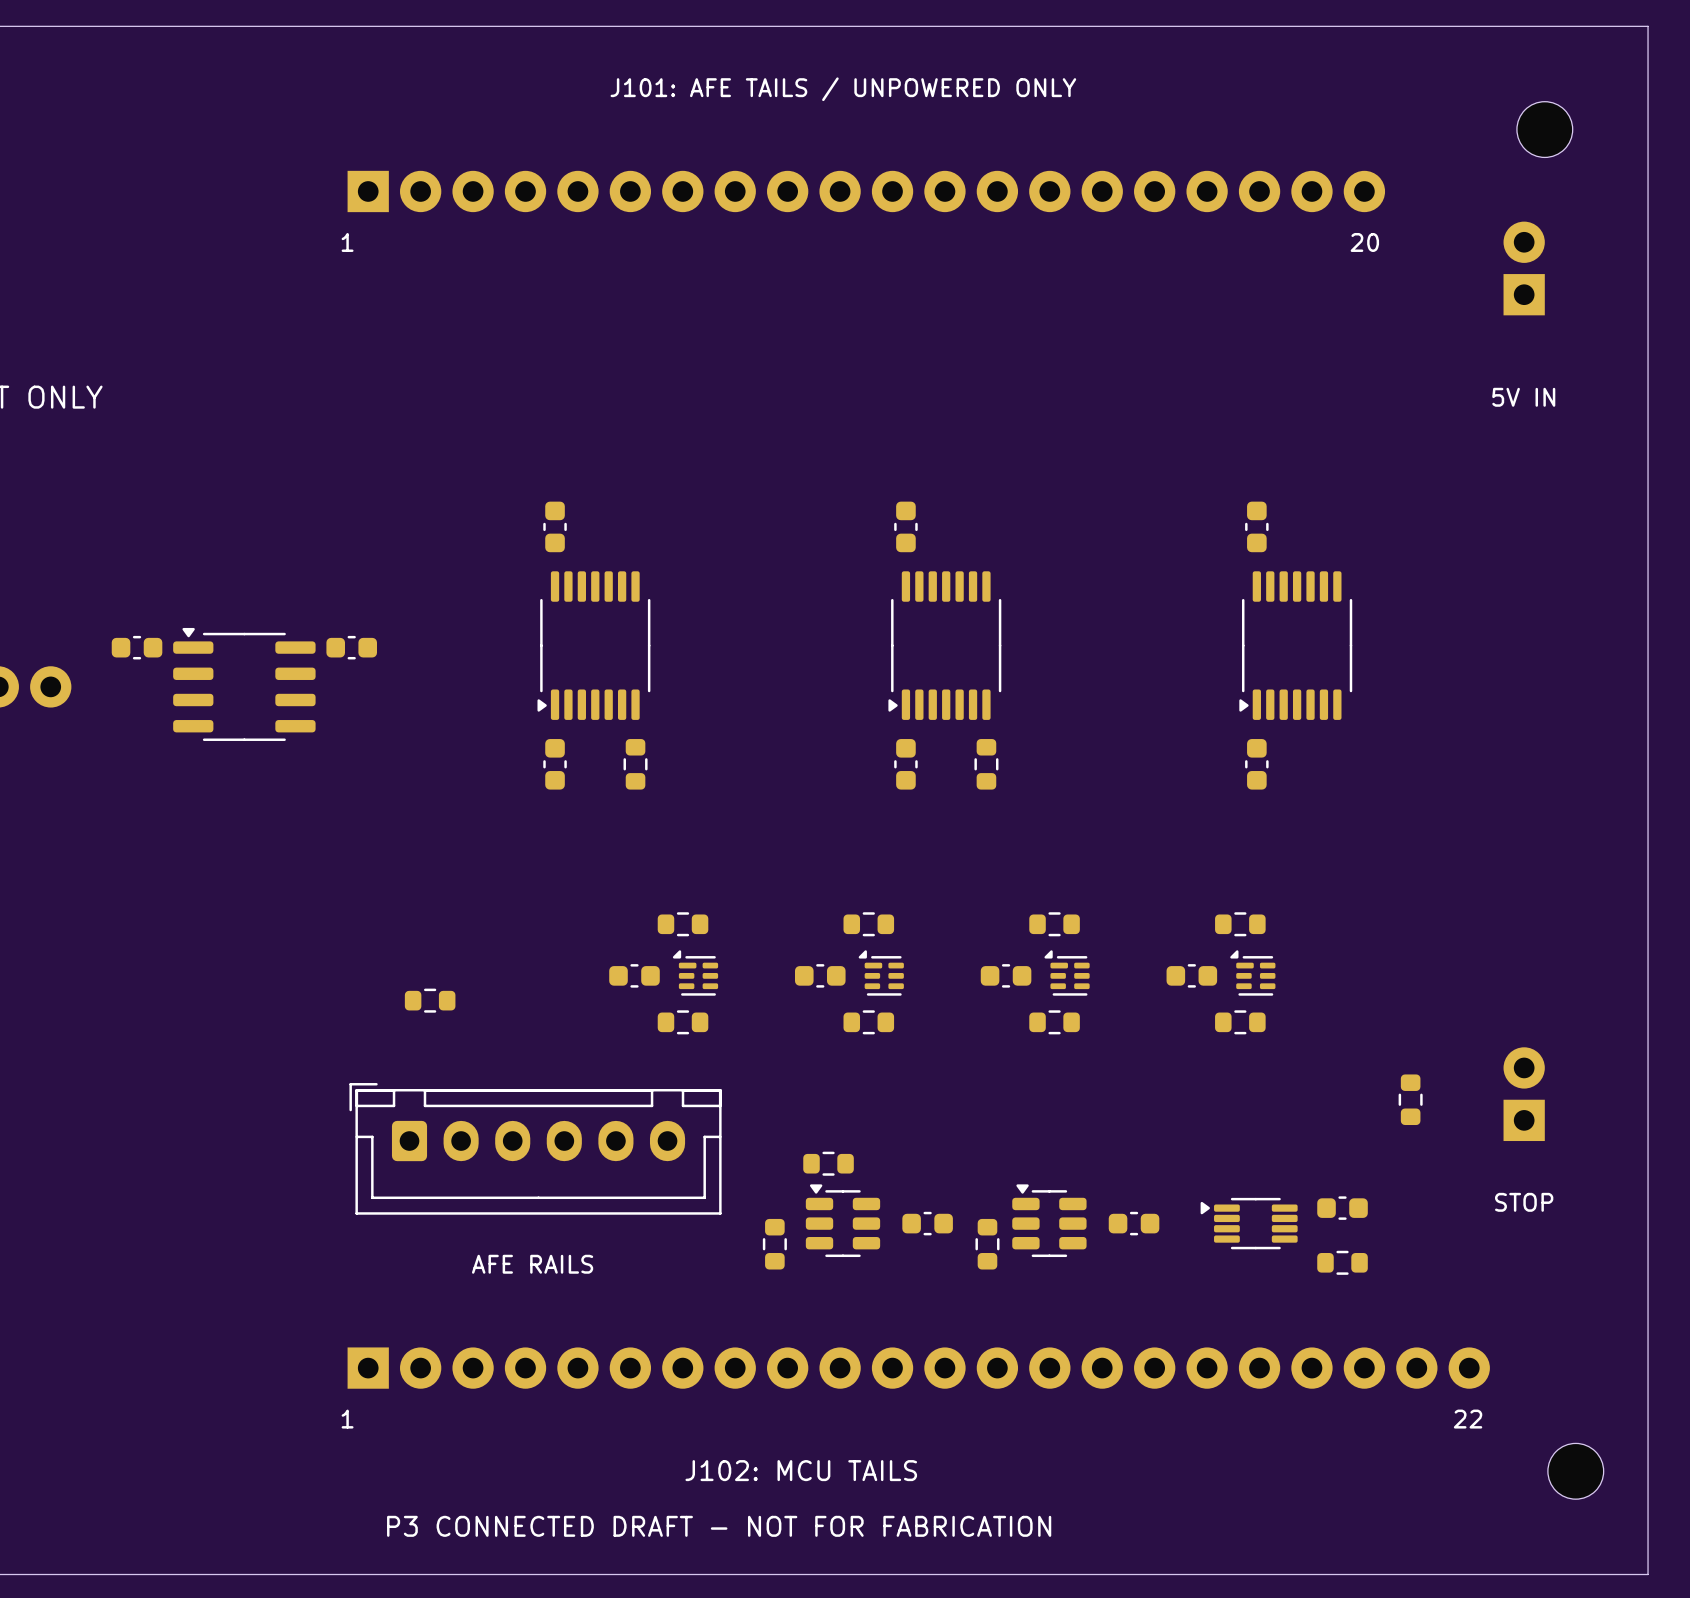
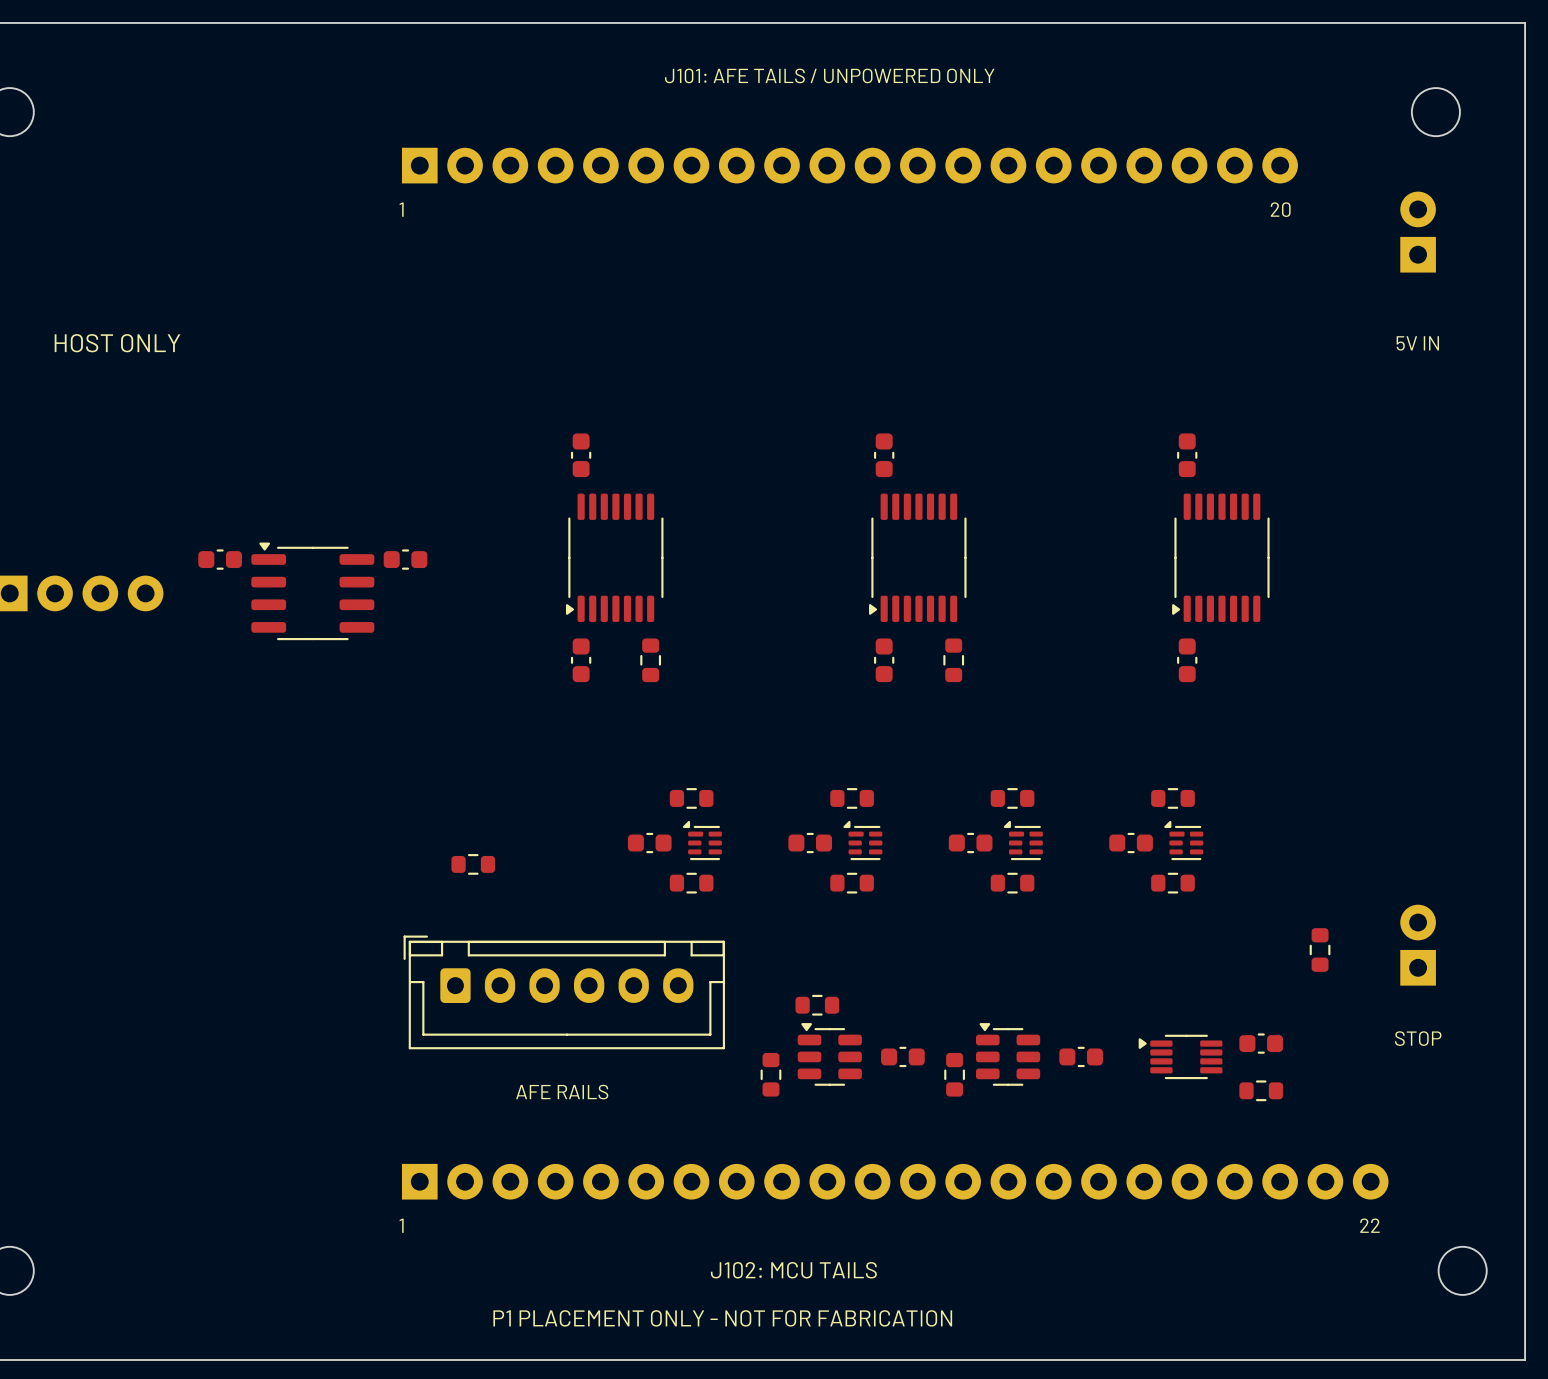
text: P3 CONNECTED DRAFT - NOT FOR FABRICATION (719, 1526) -> P1 PLACEMENT ONLY - NOT FOR FABRICATION (722, 1318)

